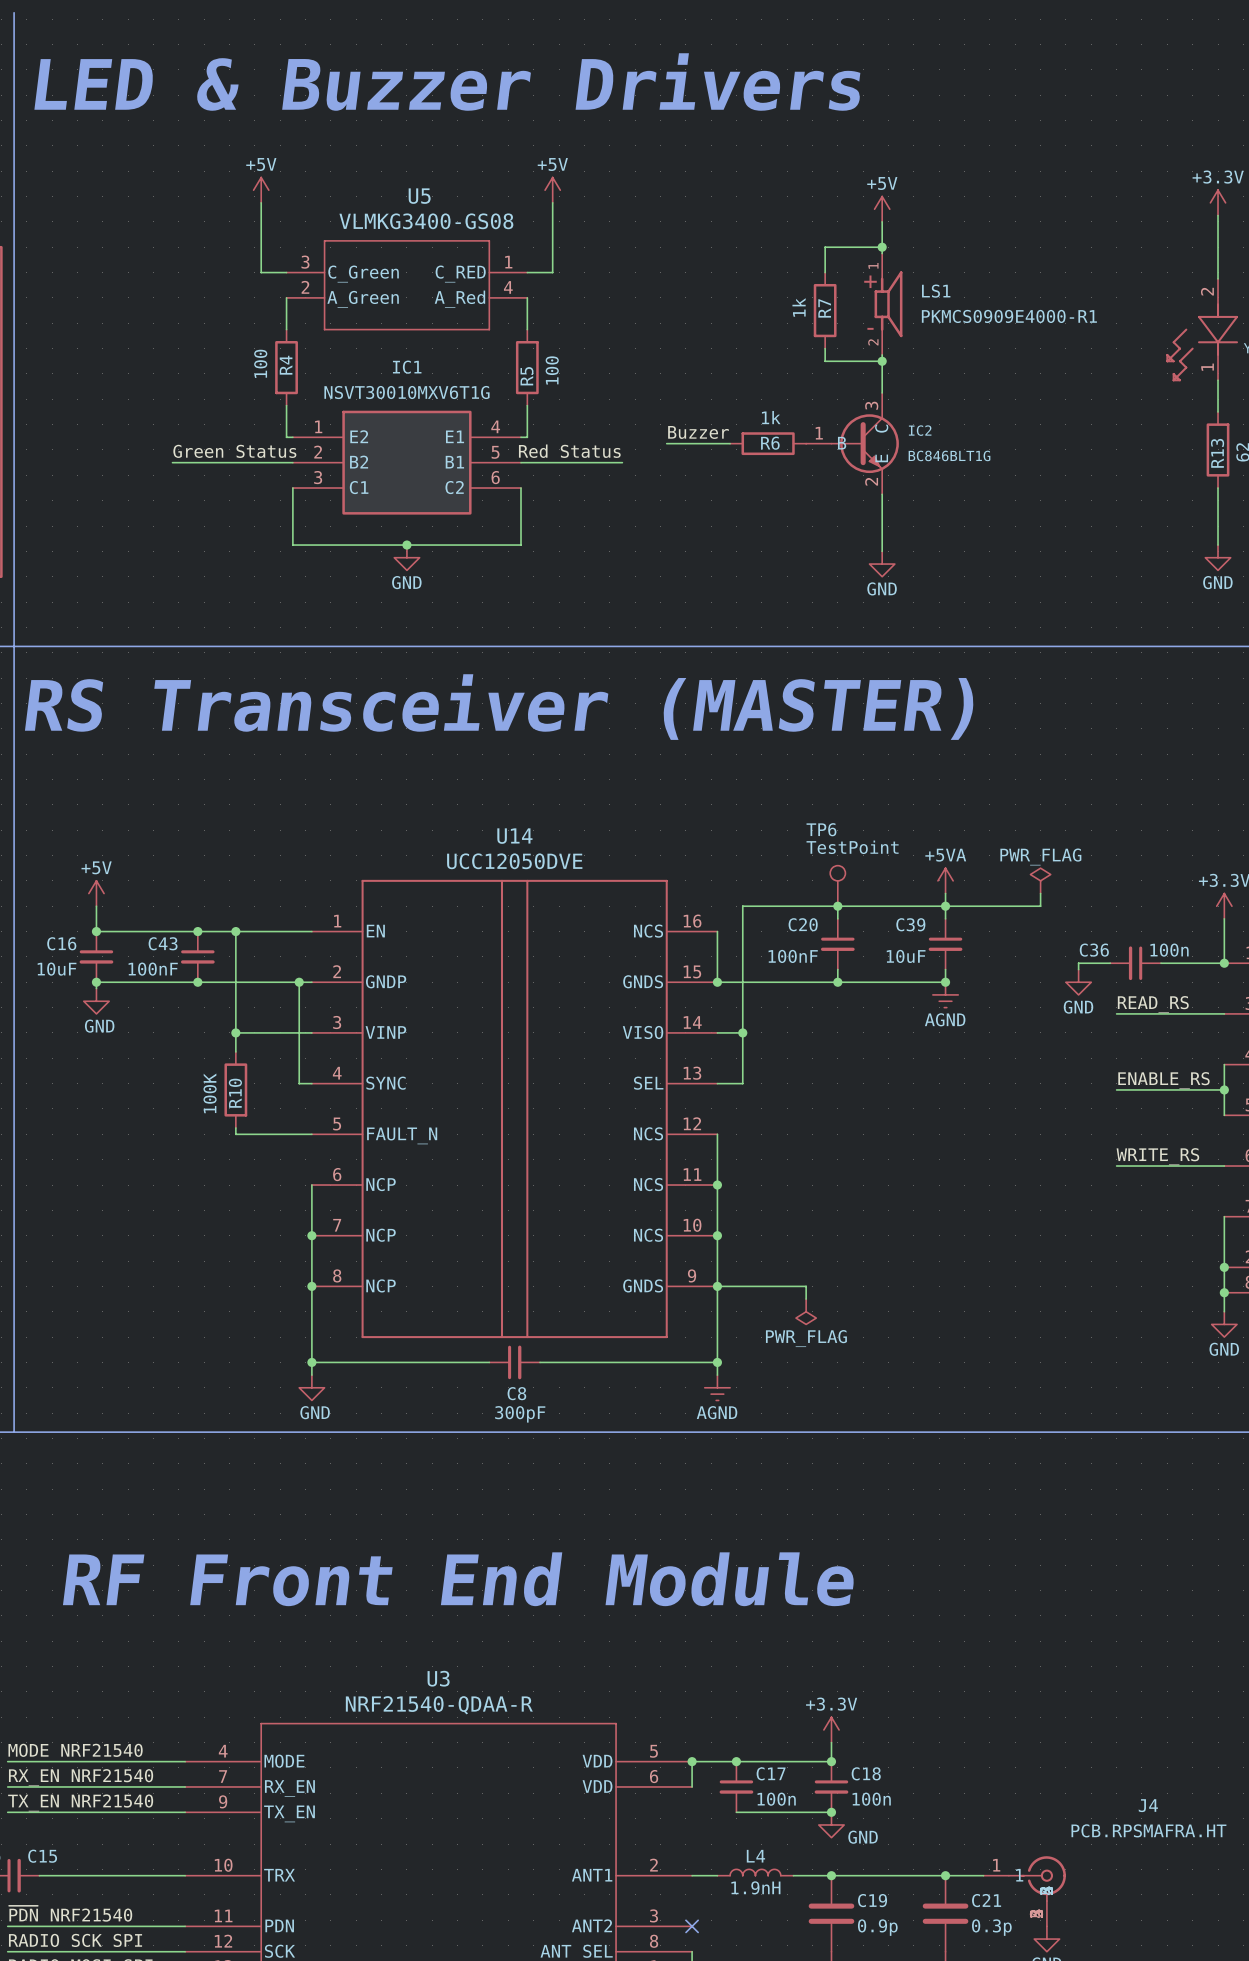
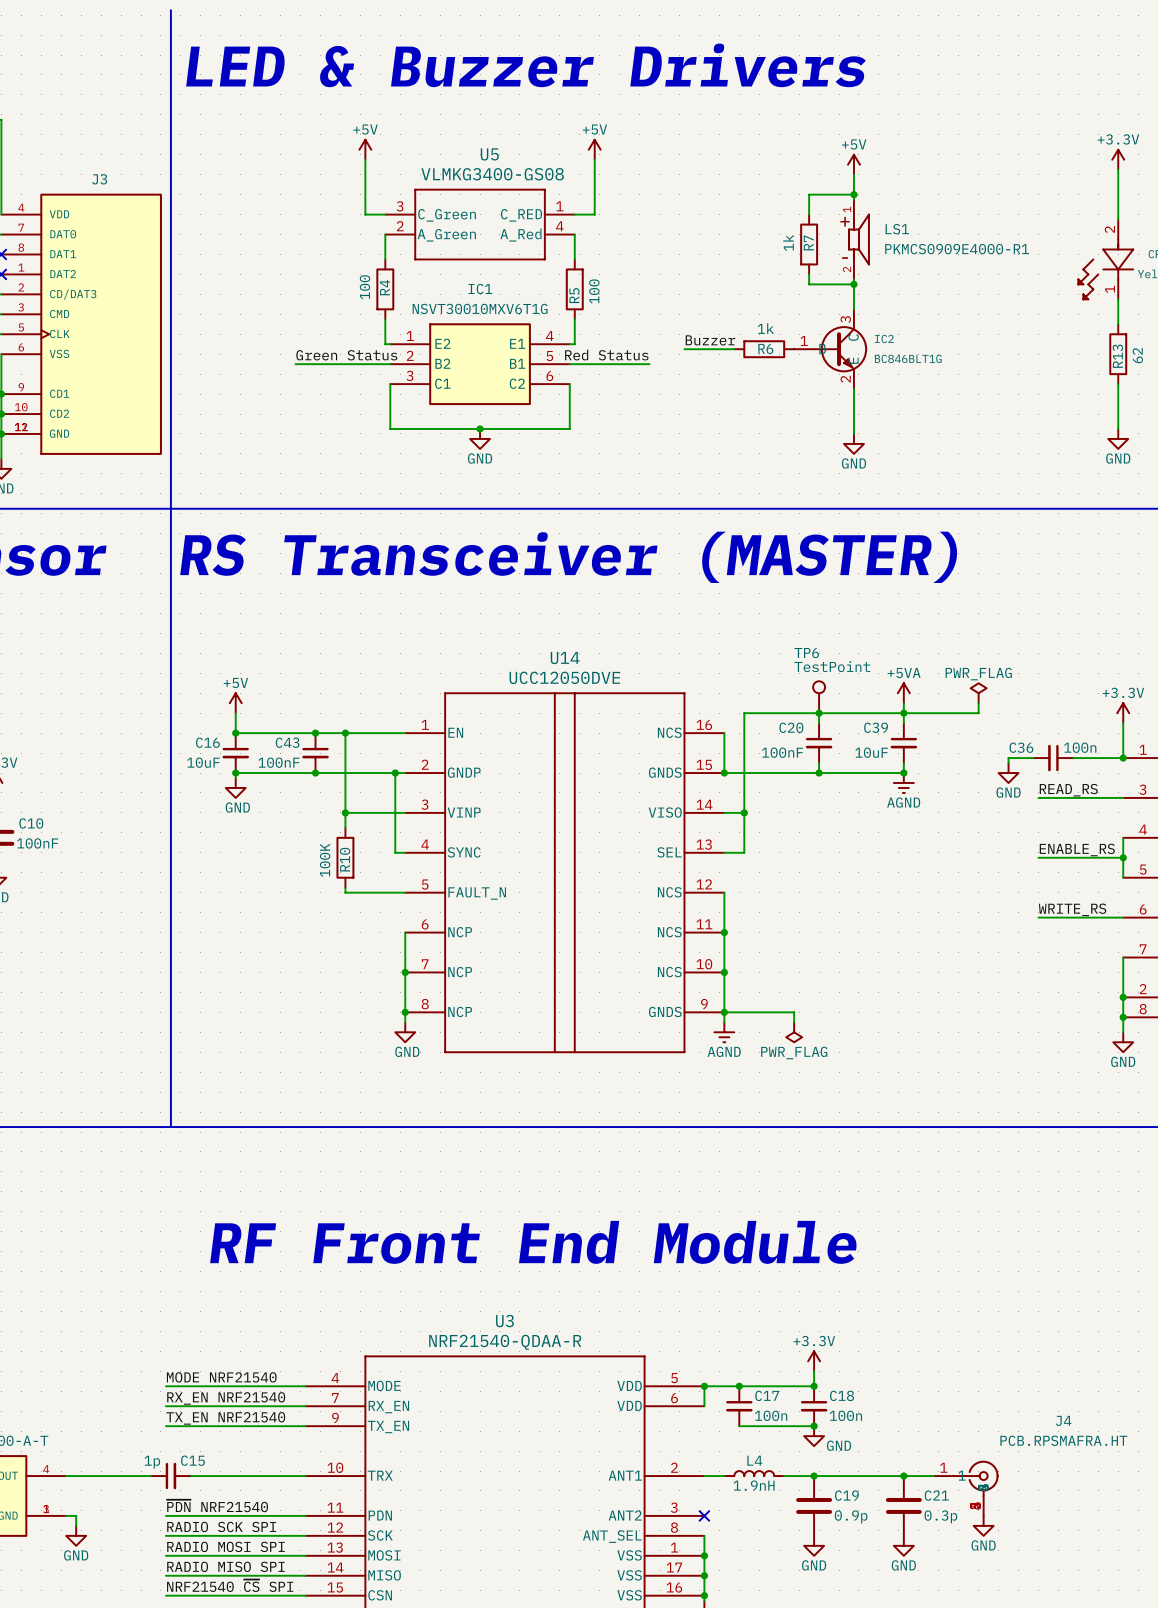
wire: (311, 1299) (311, 1375) -> none
wire: (717, 1299) (717, 1375) -> none
wire: (311, 1362) (489, 1362) -> none
junction: (311, 1362) -> none
C8: 300pF (514, 1362) -> none
wire: (540, 1362) (717, 1362) -> none
junction: (717, 1362) -> none
power symbol position: GND (311, 1387) -> GND (405, 1032)
power symbol position: AGND (717, 1387) -> AGND (724, 1032)

